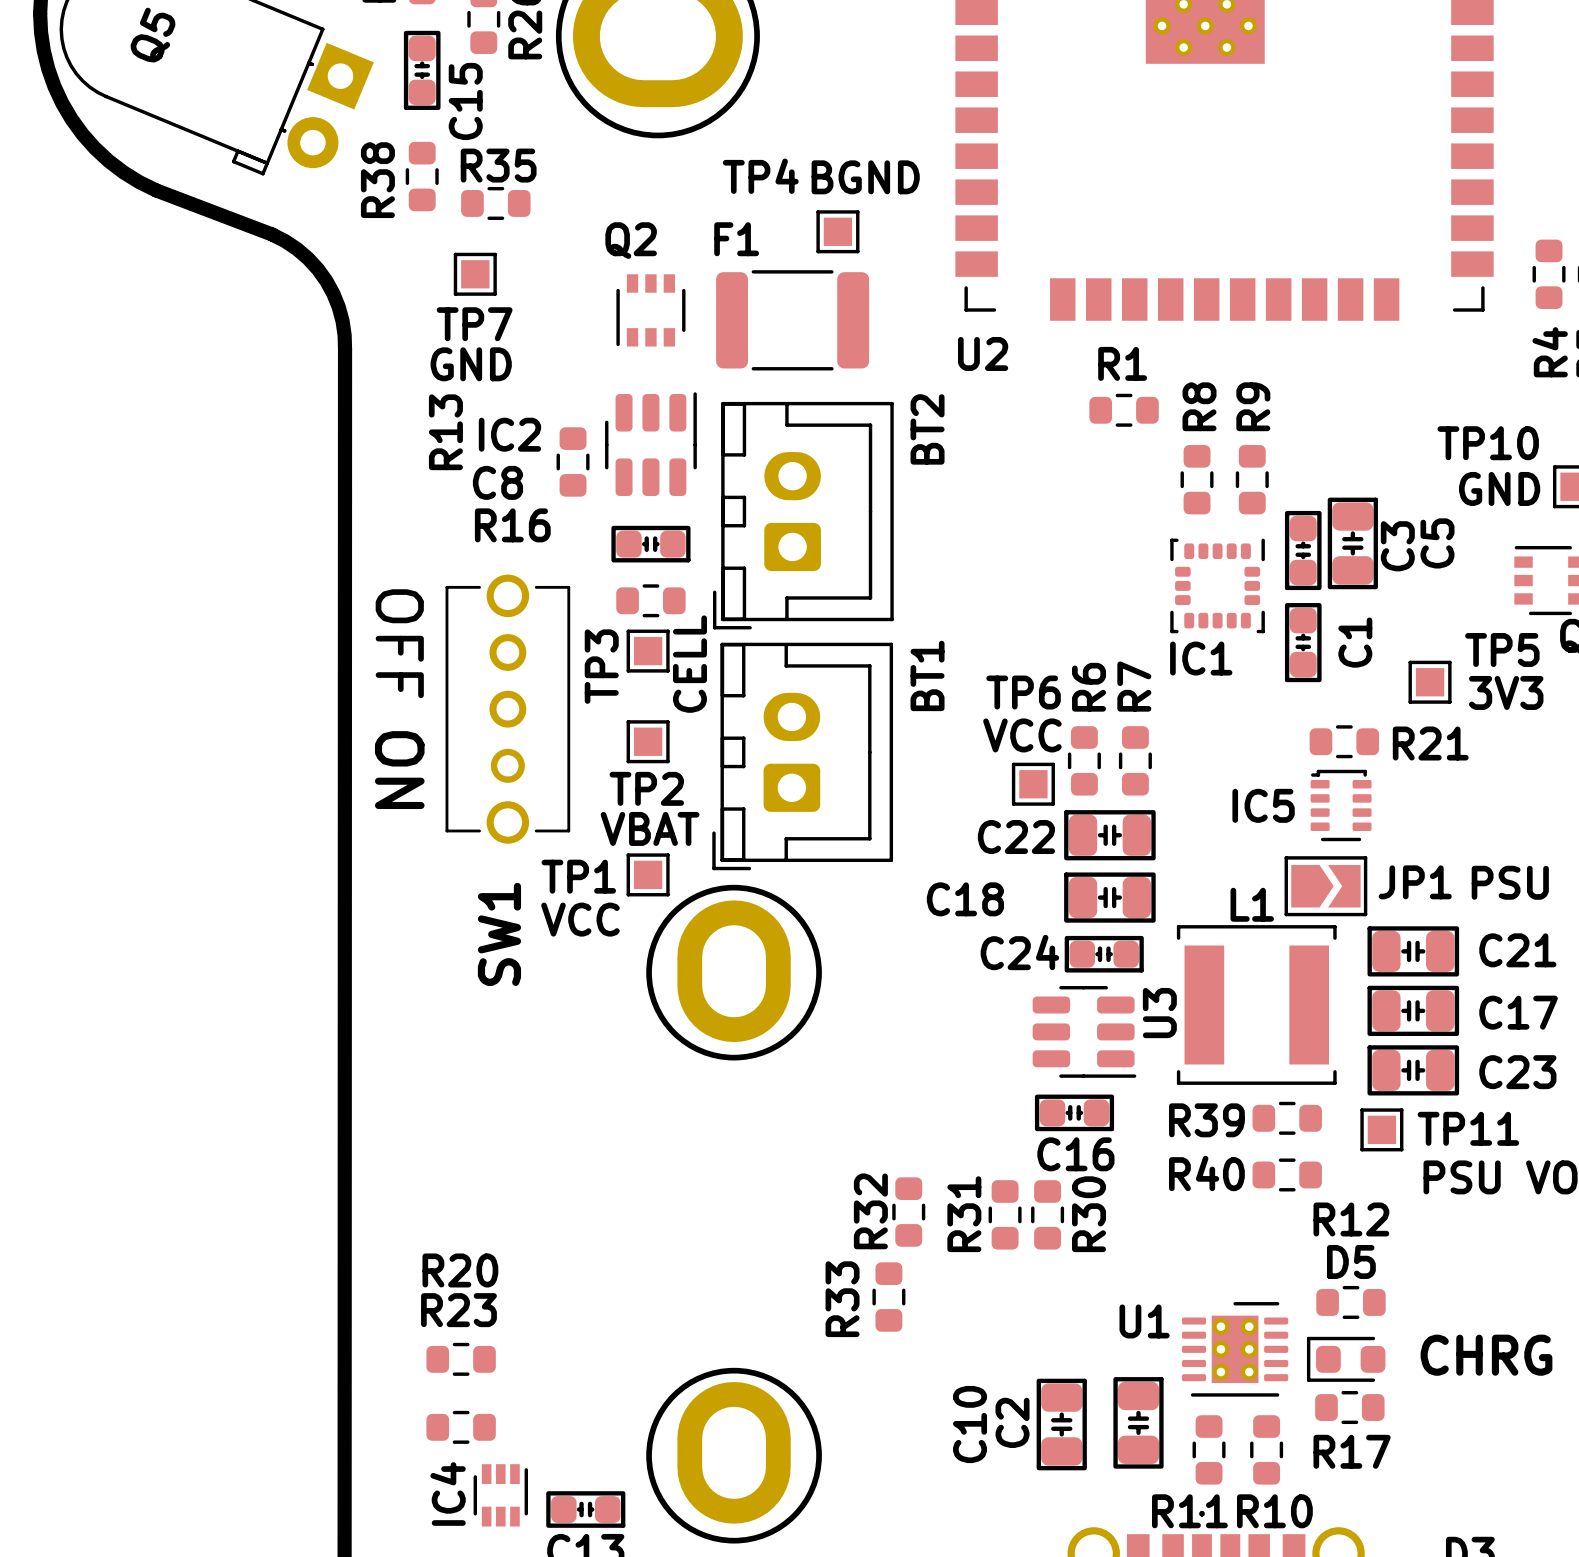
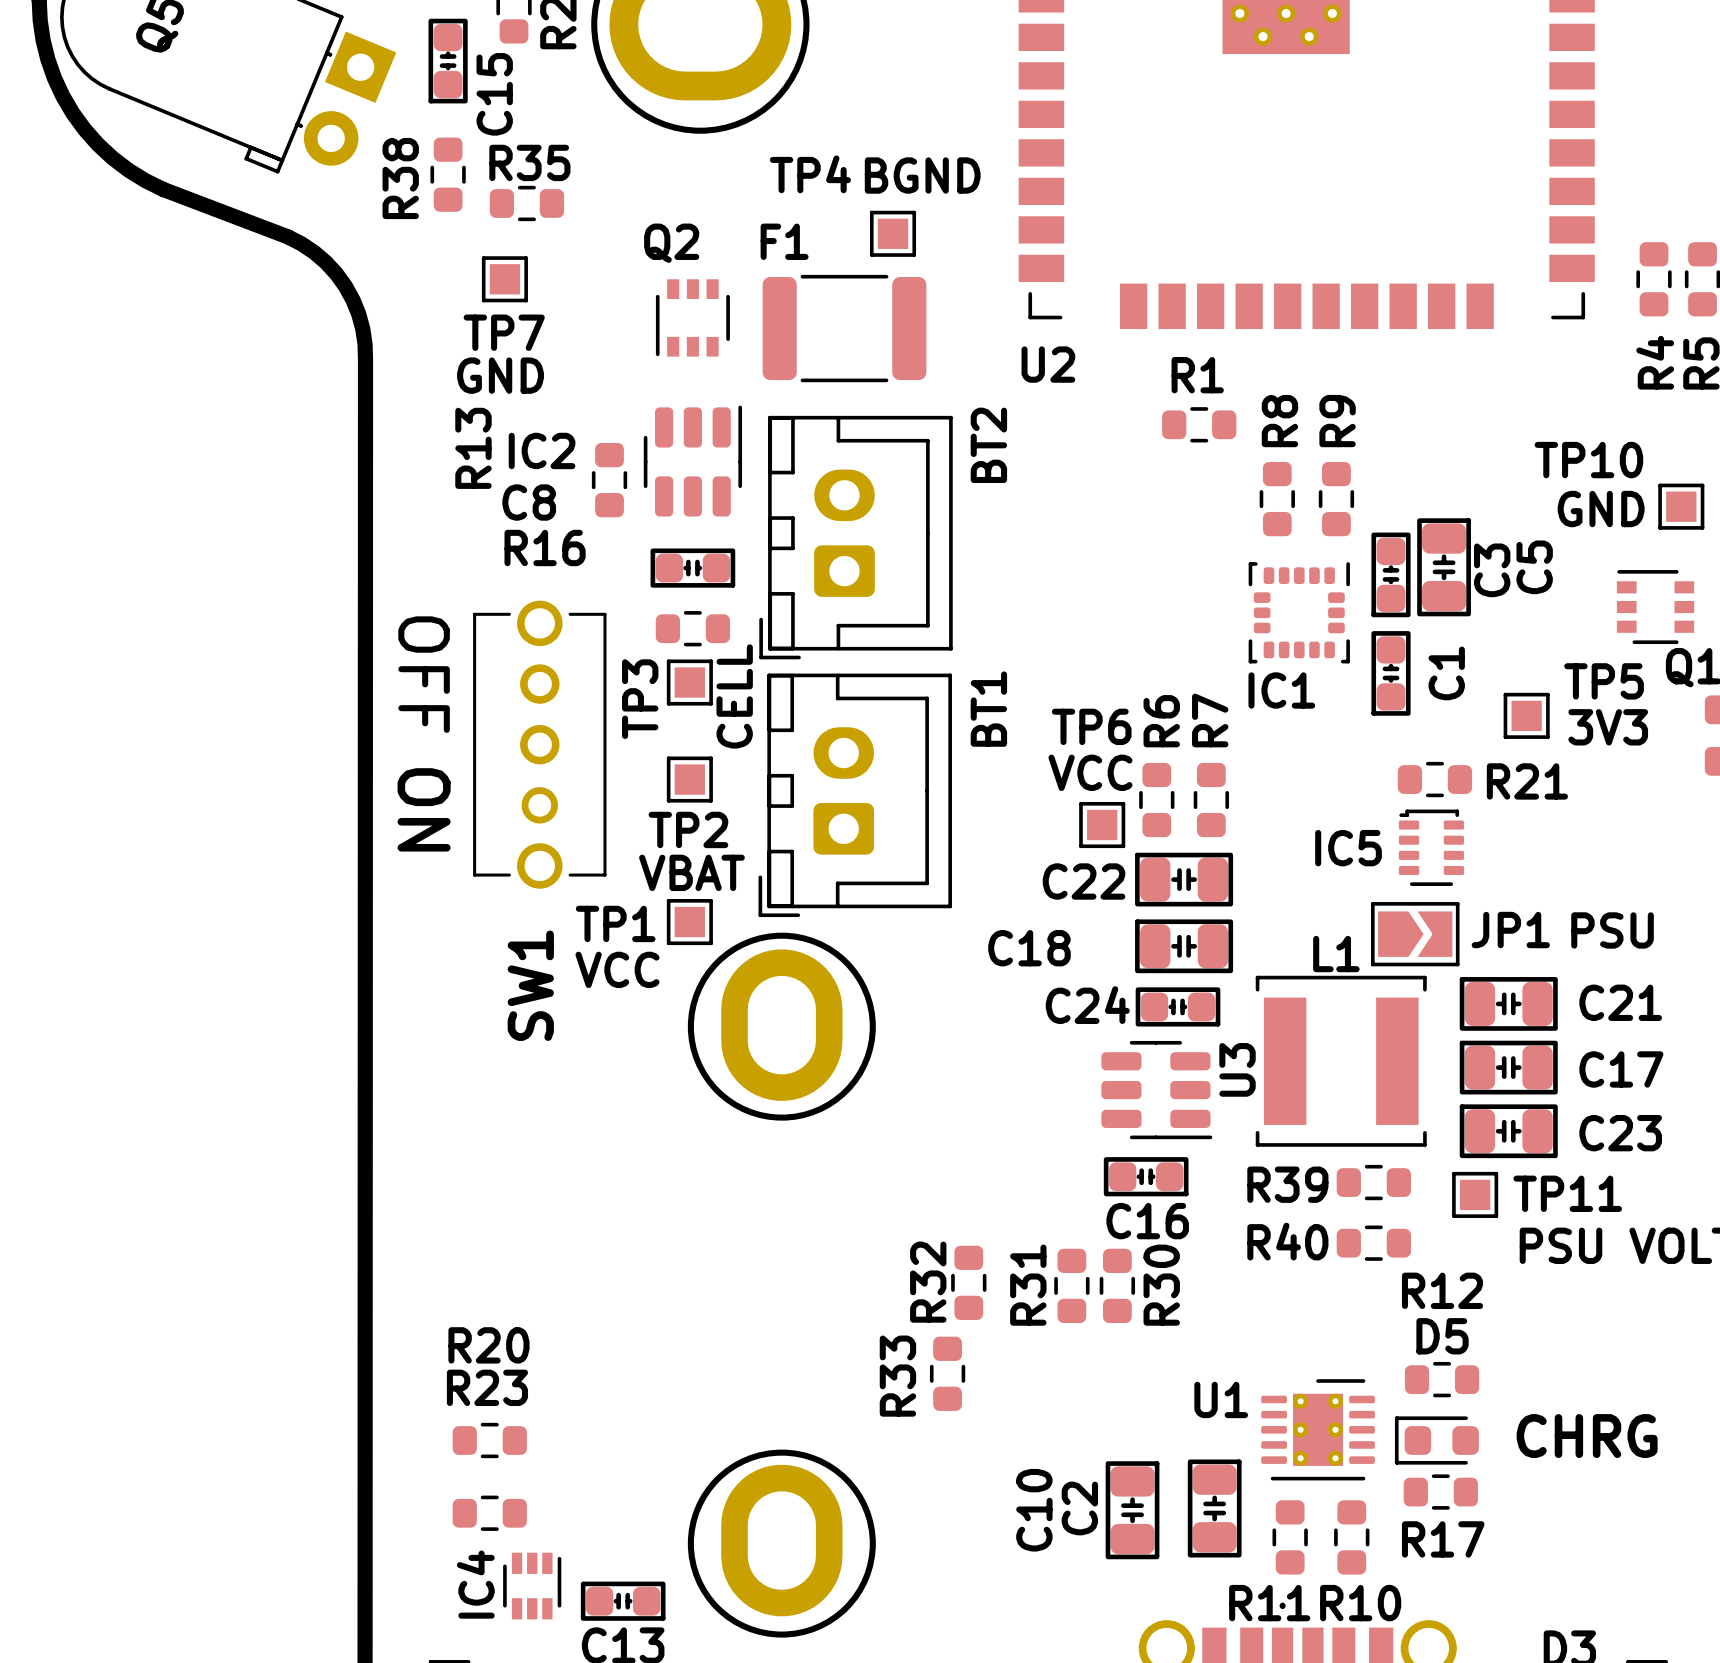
U1 footprint: [1181, 1302, 1289, 1397] -> [1261, 1379, 1375, 1481]

